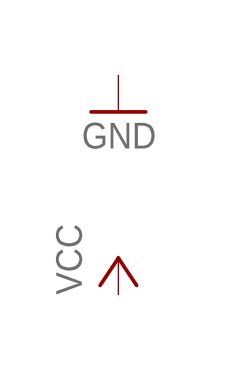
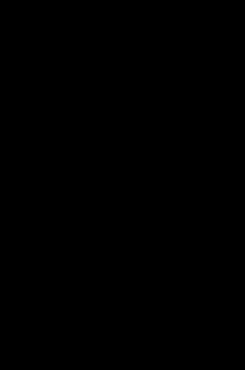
power symbol: GND (118, 94) -> none
power symbol: VCC (118, 275) -> none

